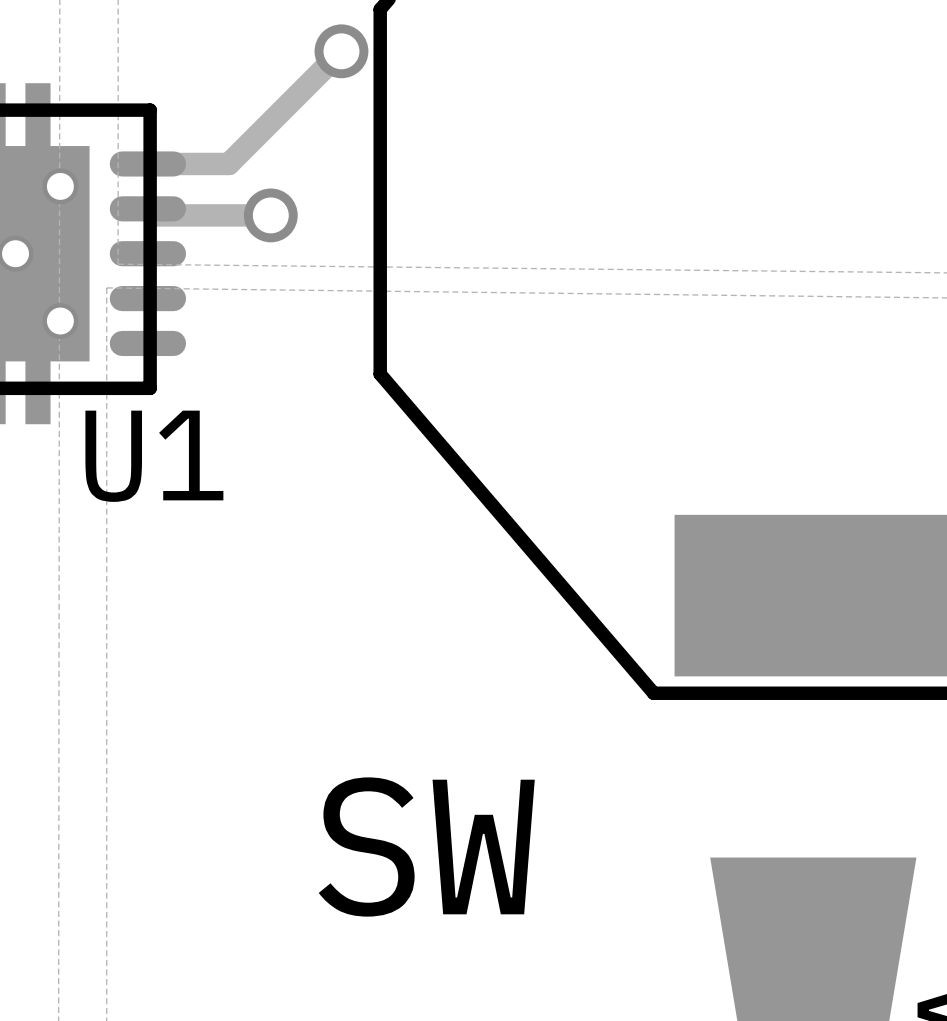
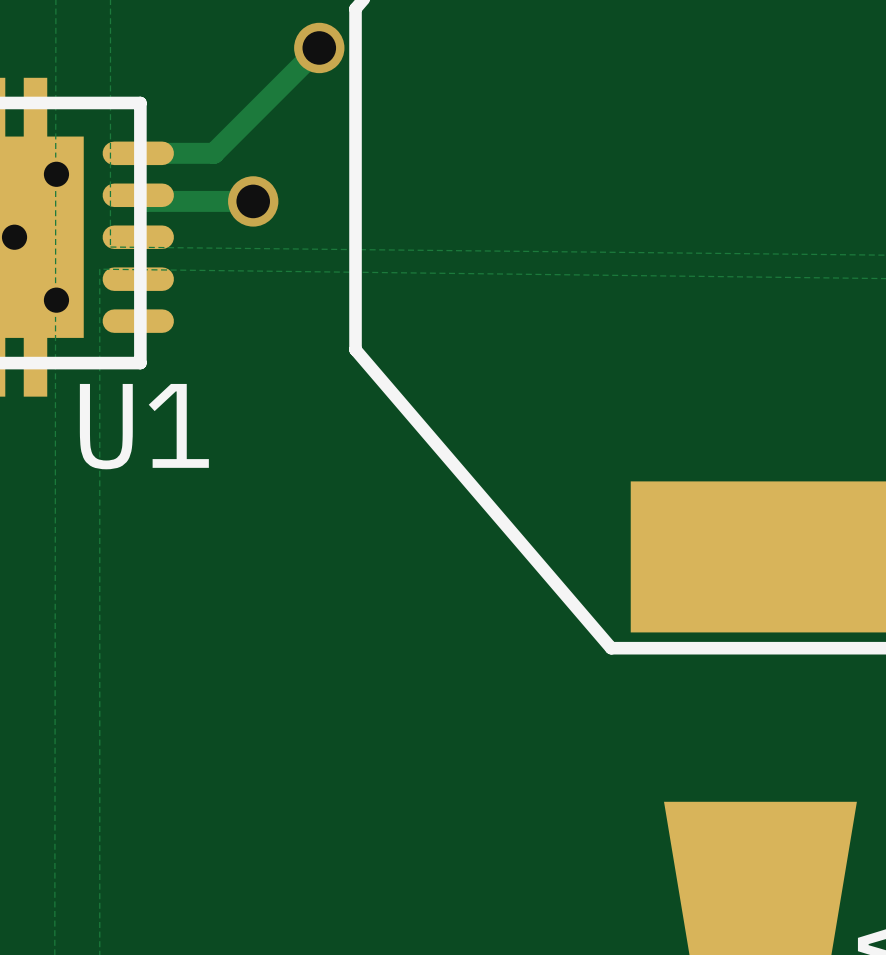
text: SW (426, 847) -> none

